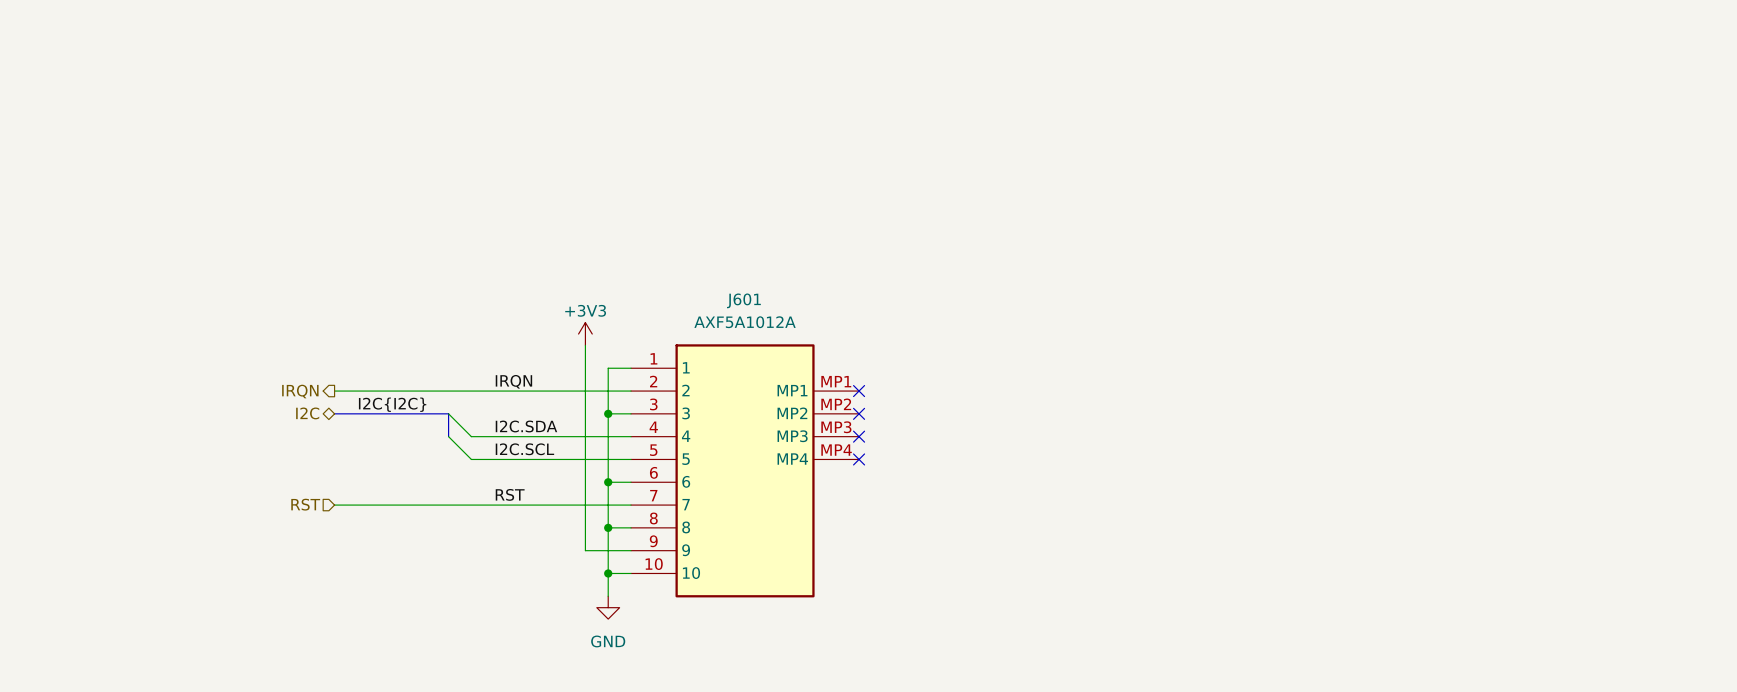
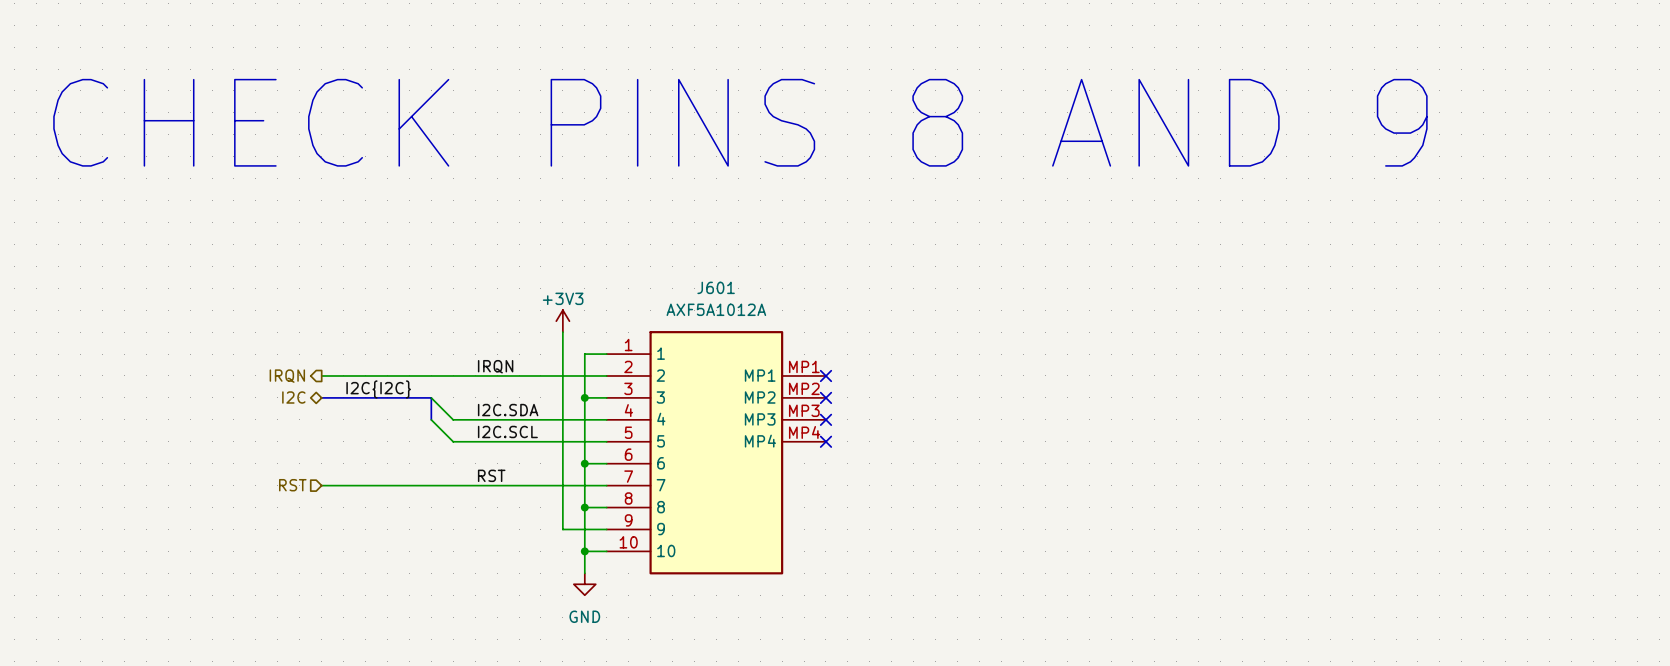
text: none -> CHECK PINS 8 AND 9 (740, 122)

